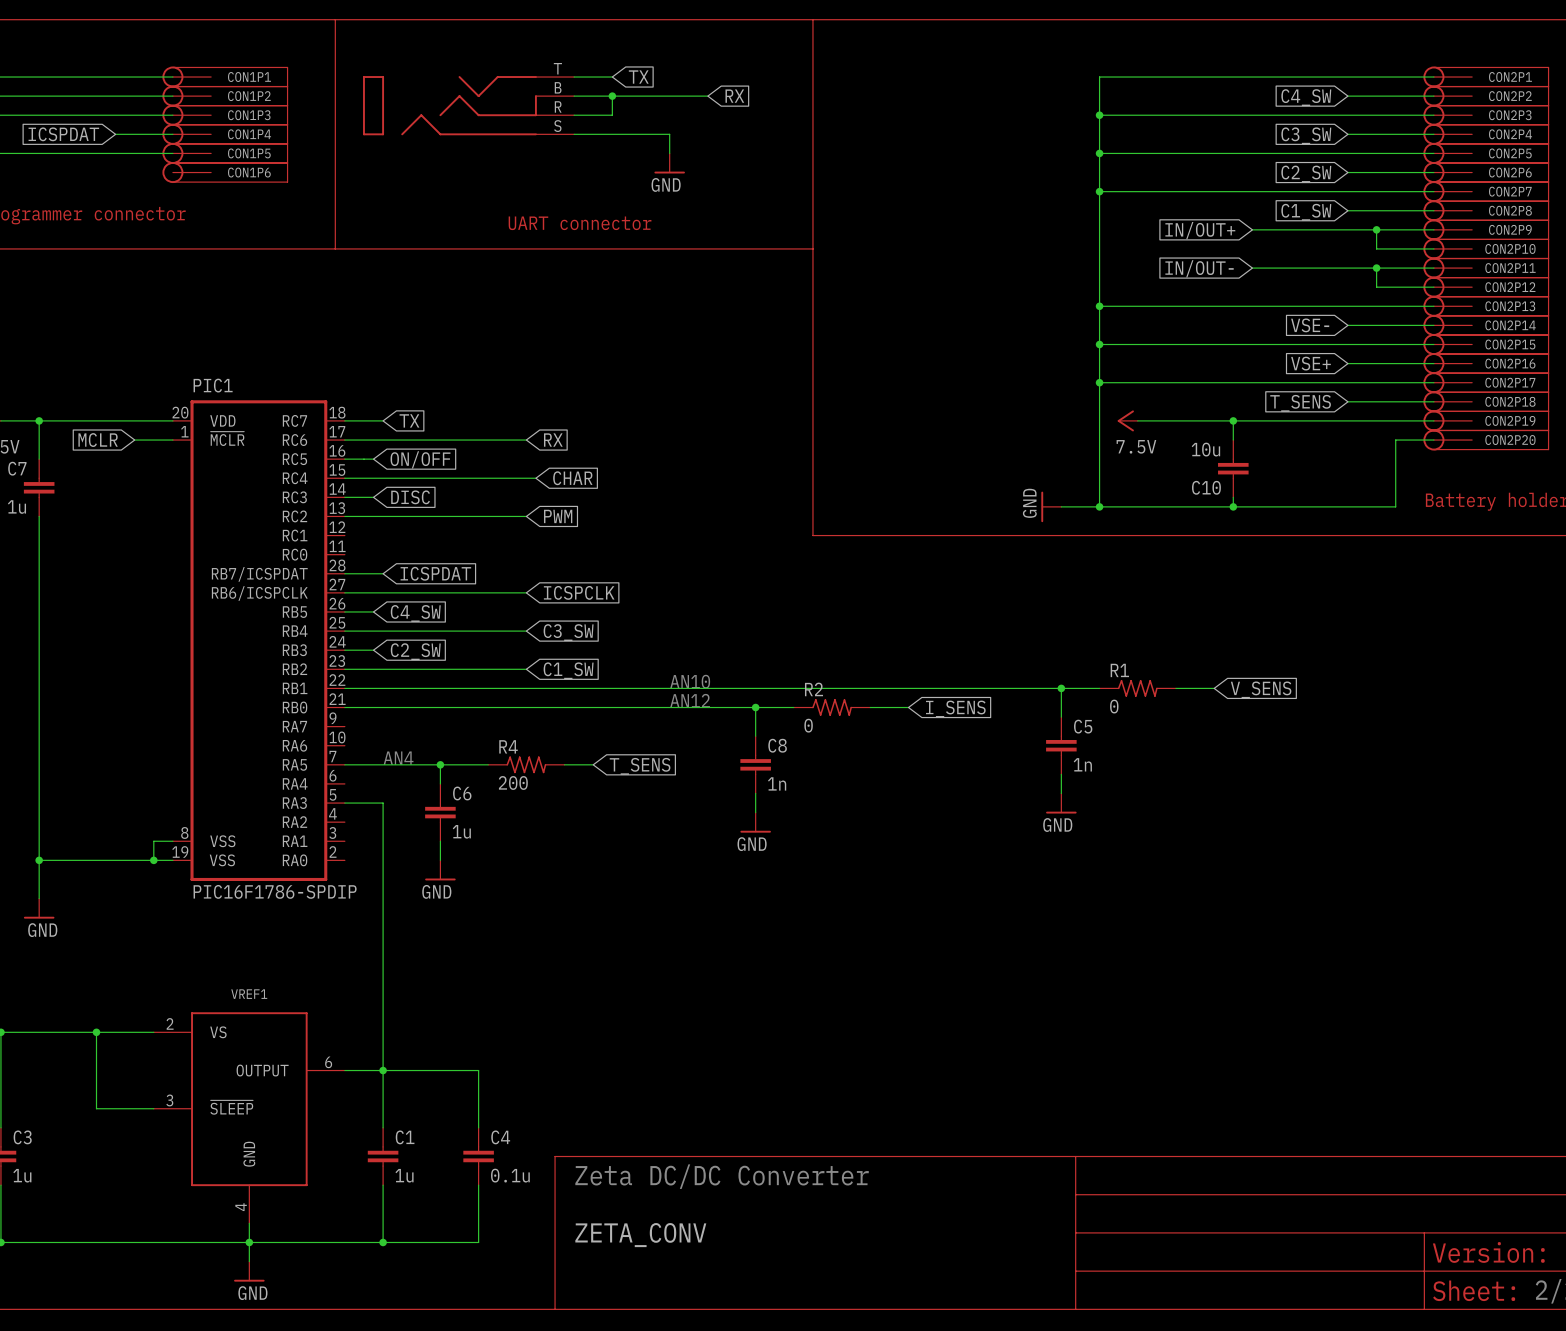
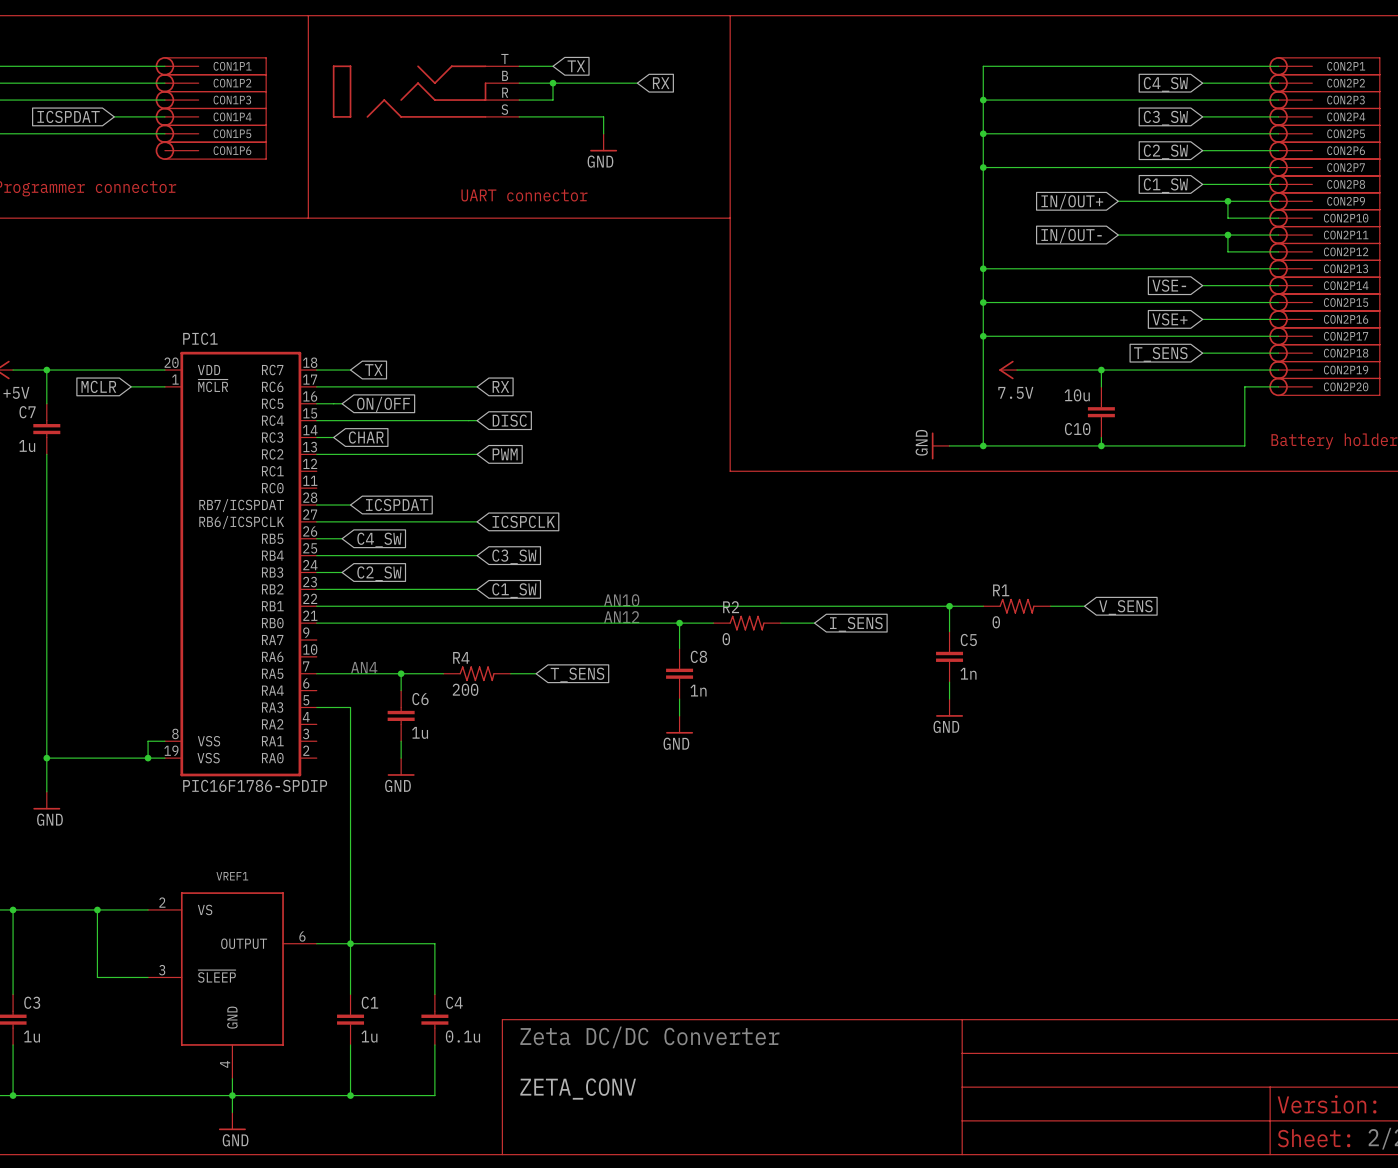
wire: (526, 478) (535, 478) -> none
global label position: CHAR (572, 478) -> CHAR (366, 437)
wire: (363, 497) (373, 497) -> none
global label position: DISC (410, 497) -> DISC (509, 420)

